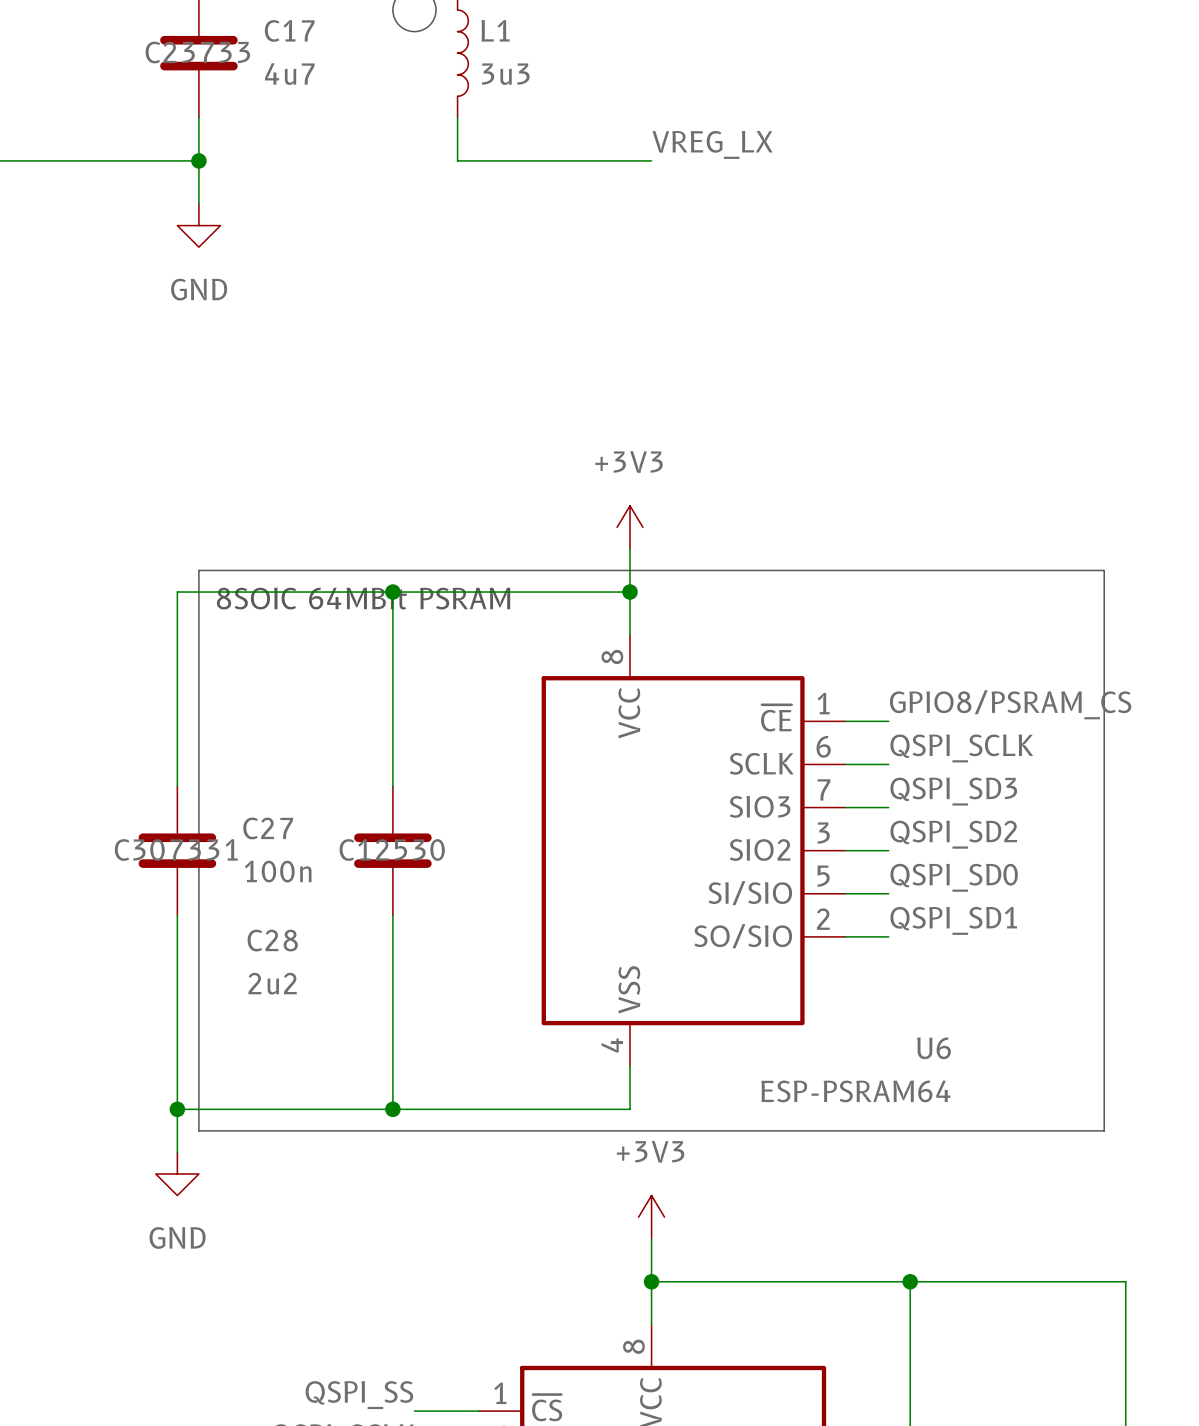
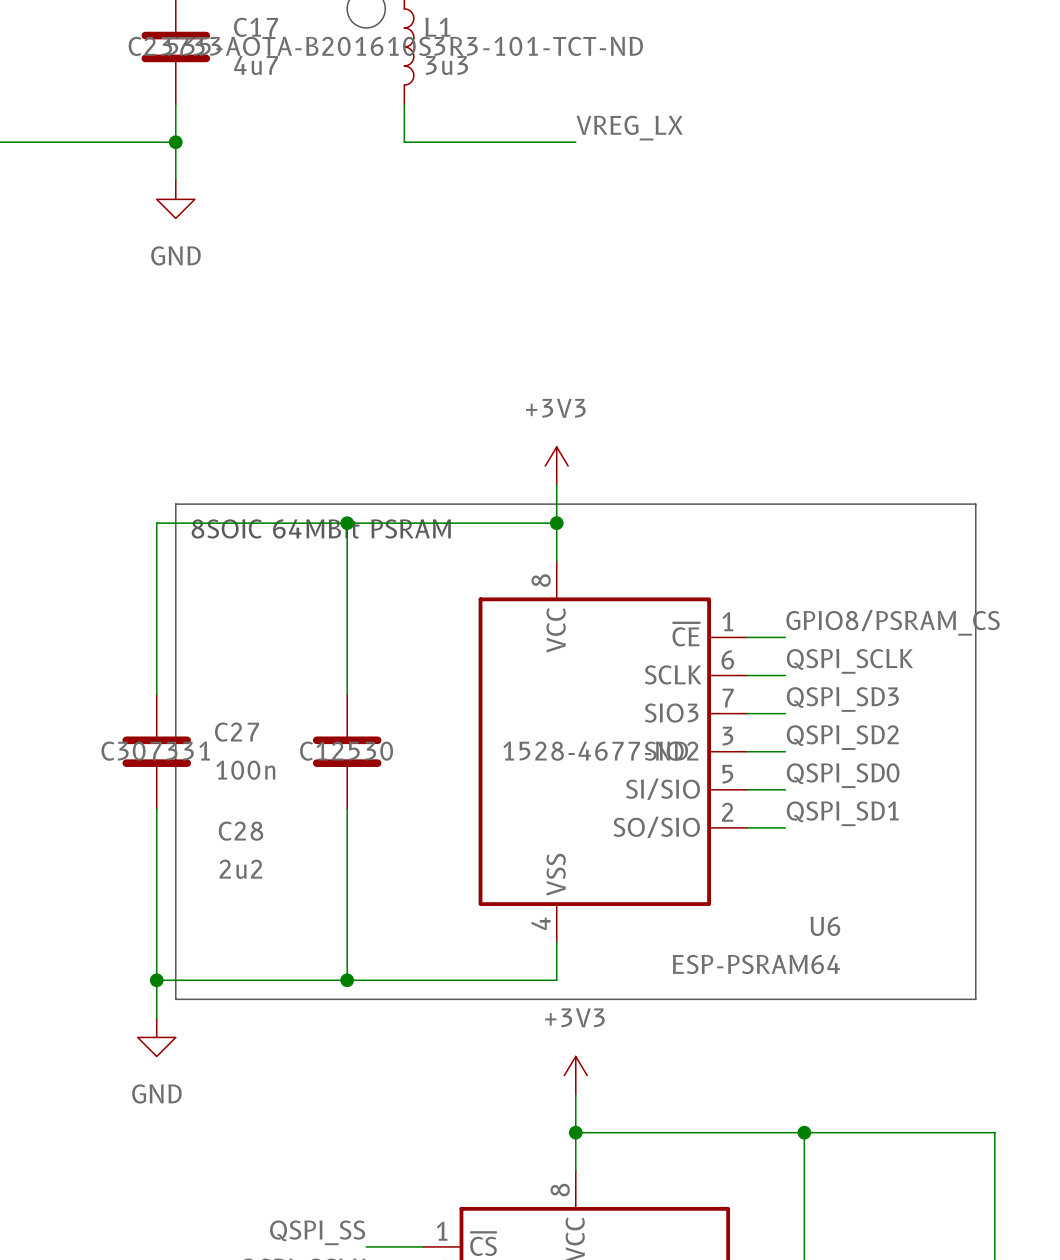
L1 text: none -> 535-AOTA-B201610S3R3-101-TCT-ND (405, 46)
U6 text: none -> 1528-4677-ND (595, 751)

